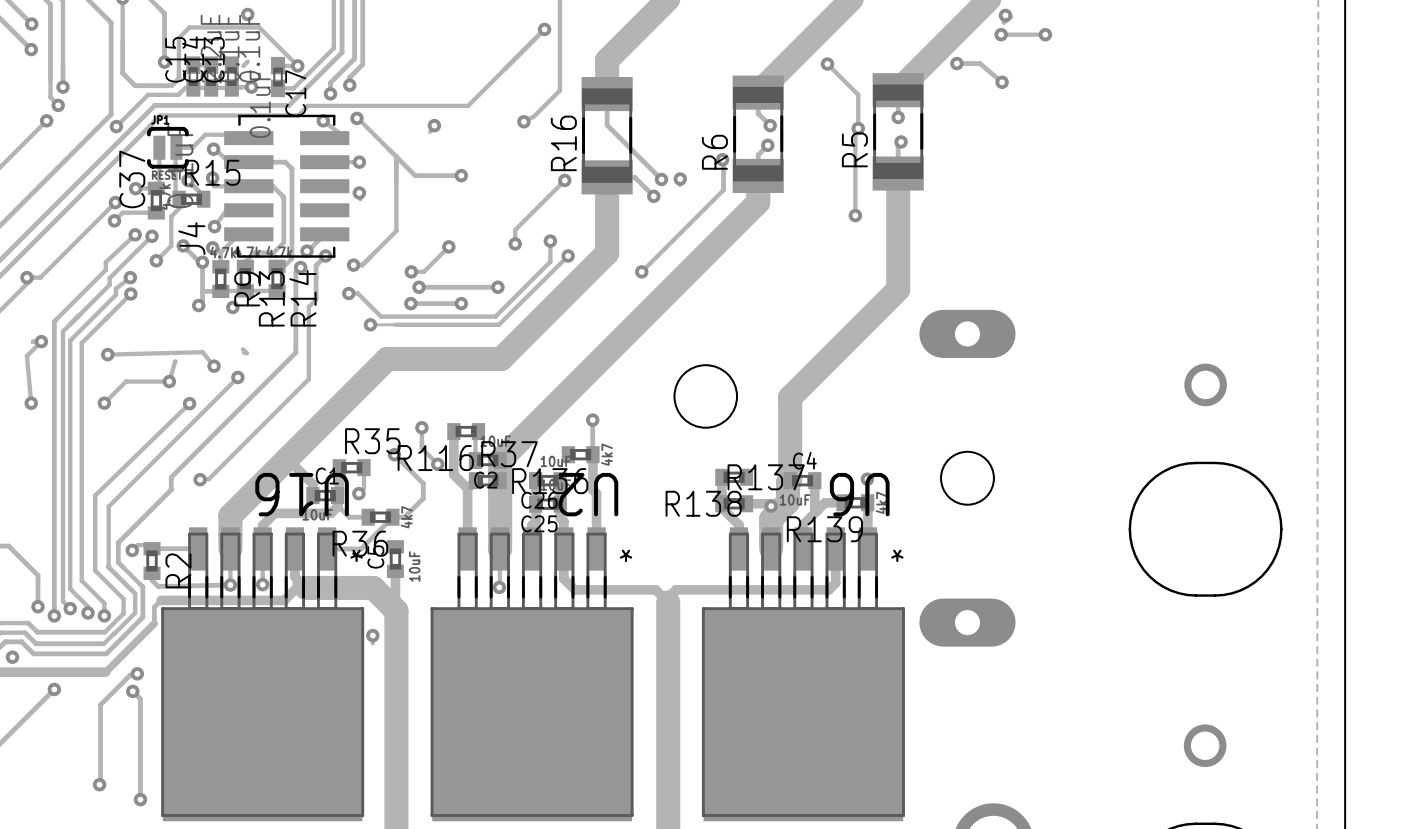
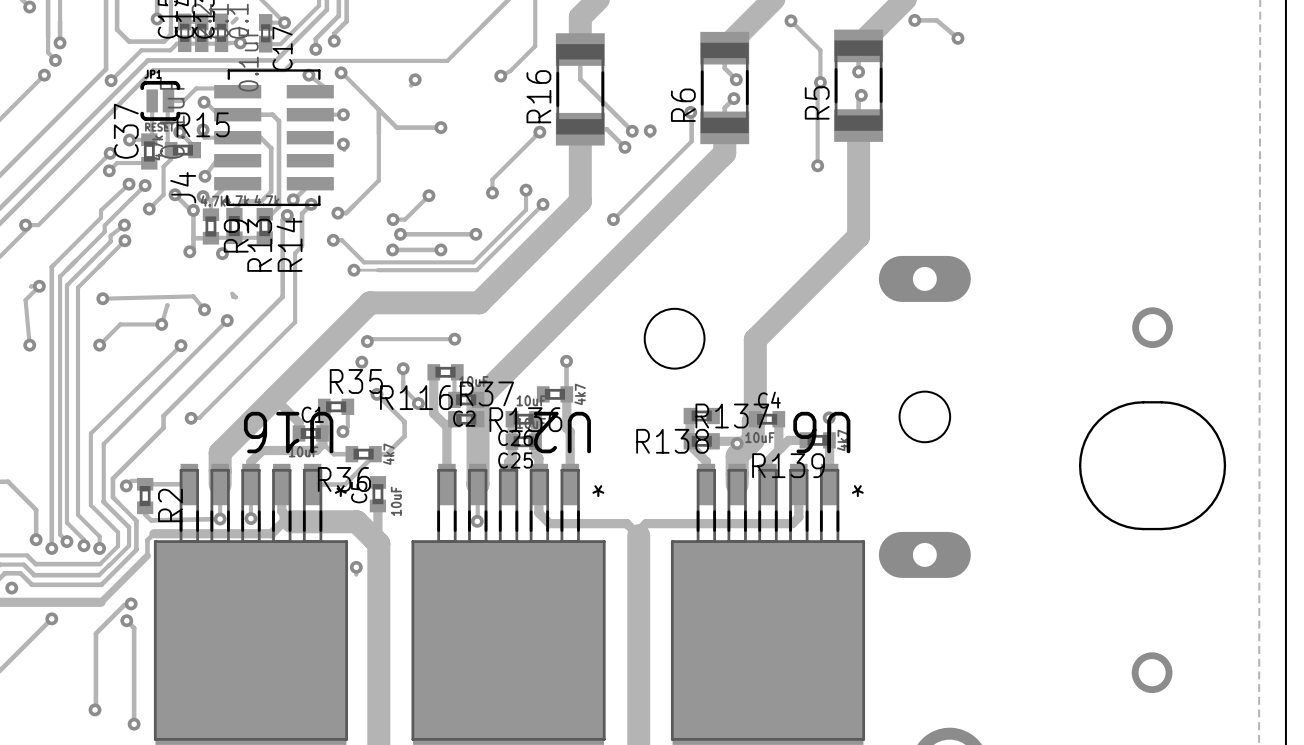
track: none -> (454, 339) (369, 339) (367, 341)
via: none -> (454, 339)
via: none -> (367, 341)
via: none -> (361, 362)

